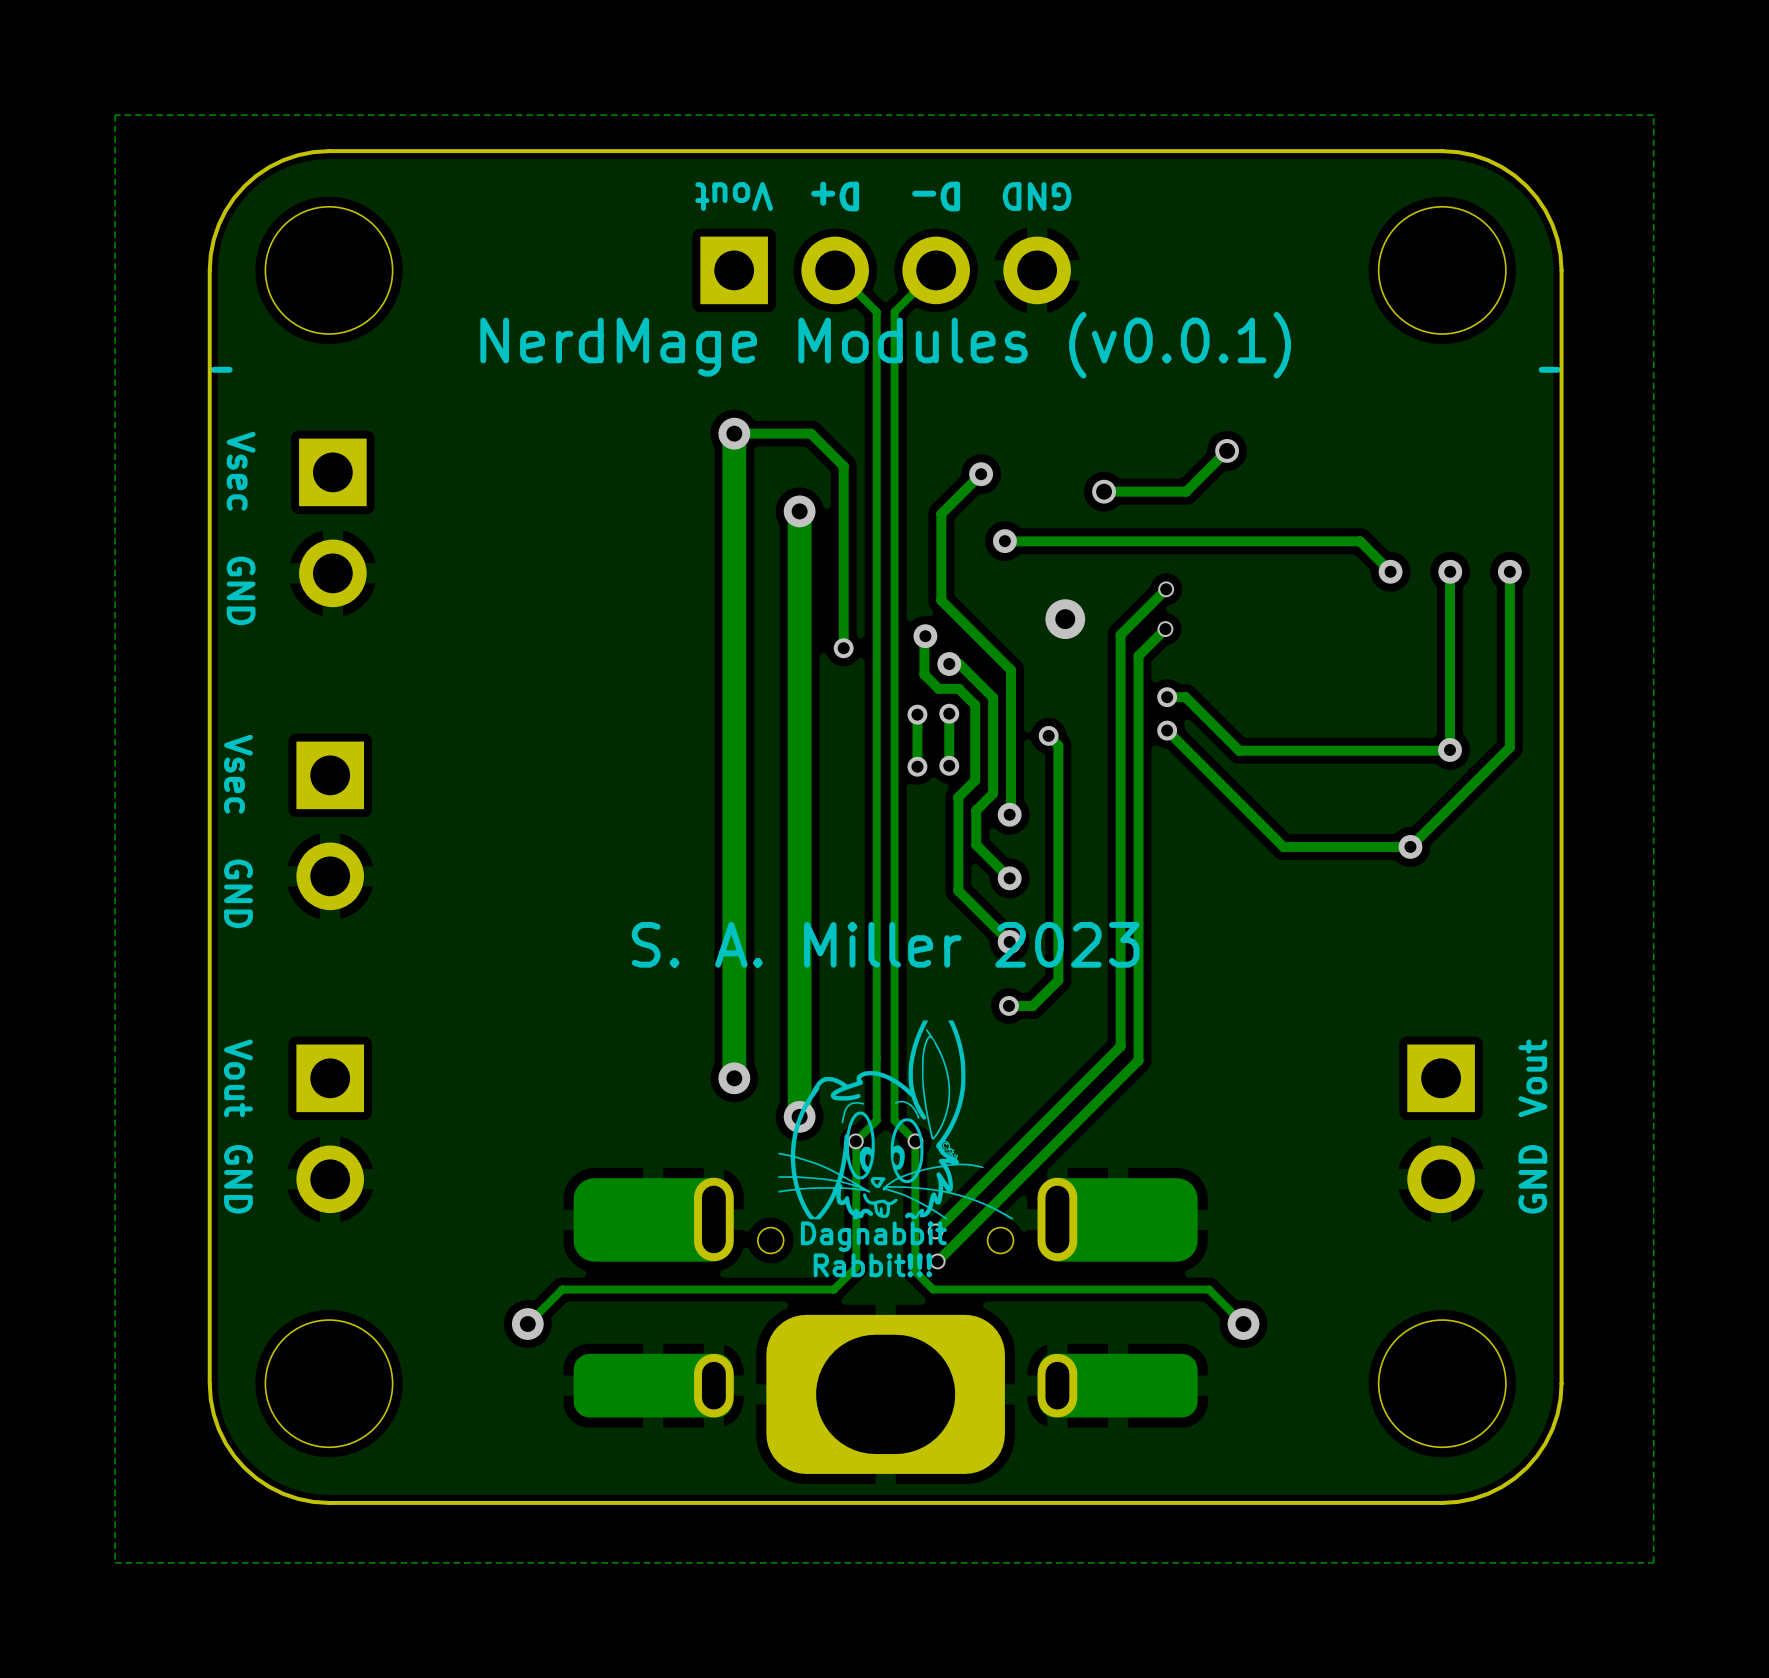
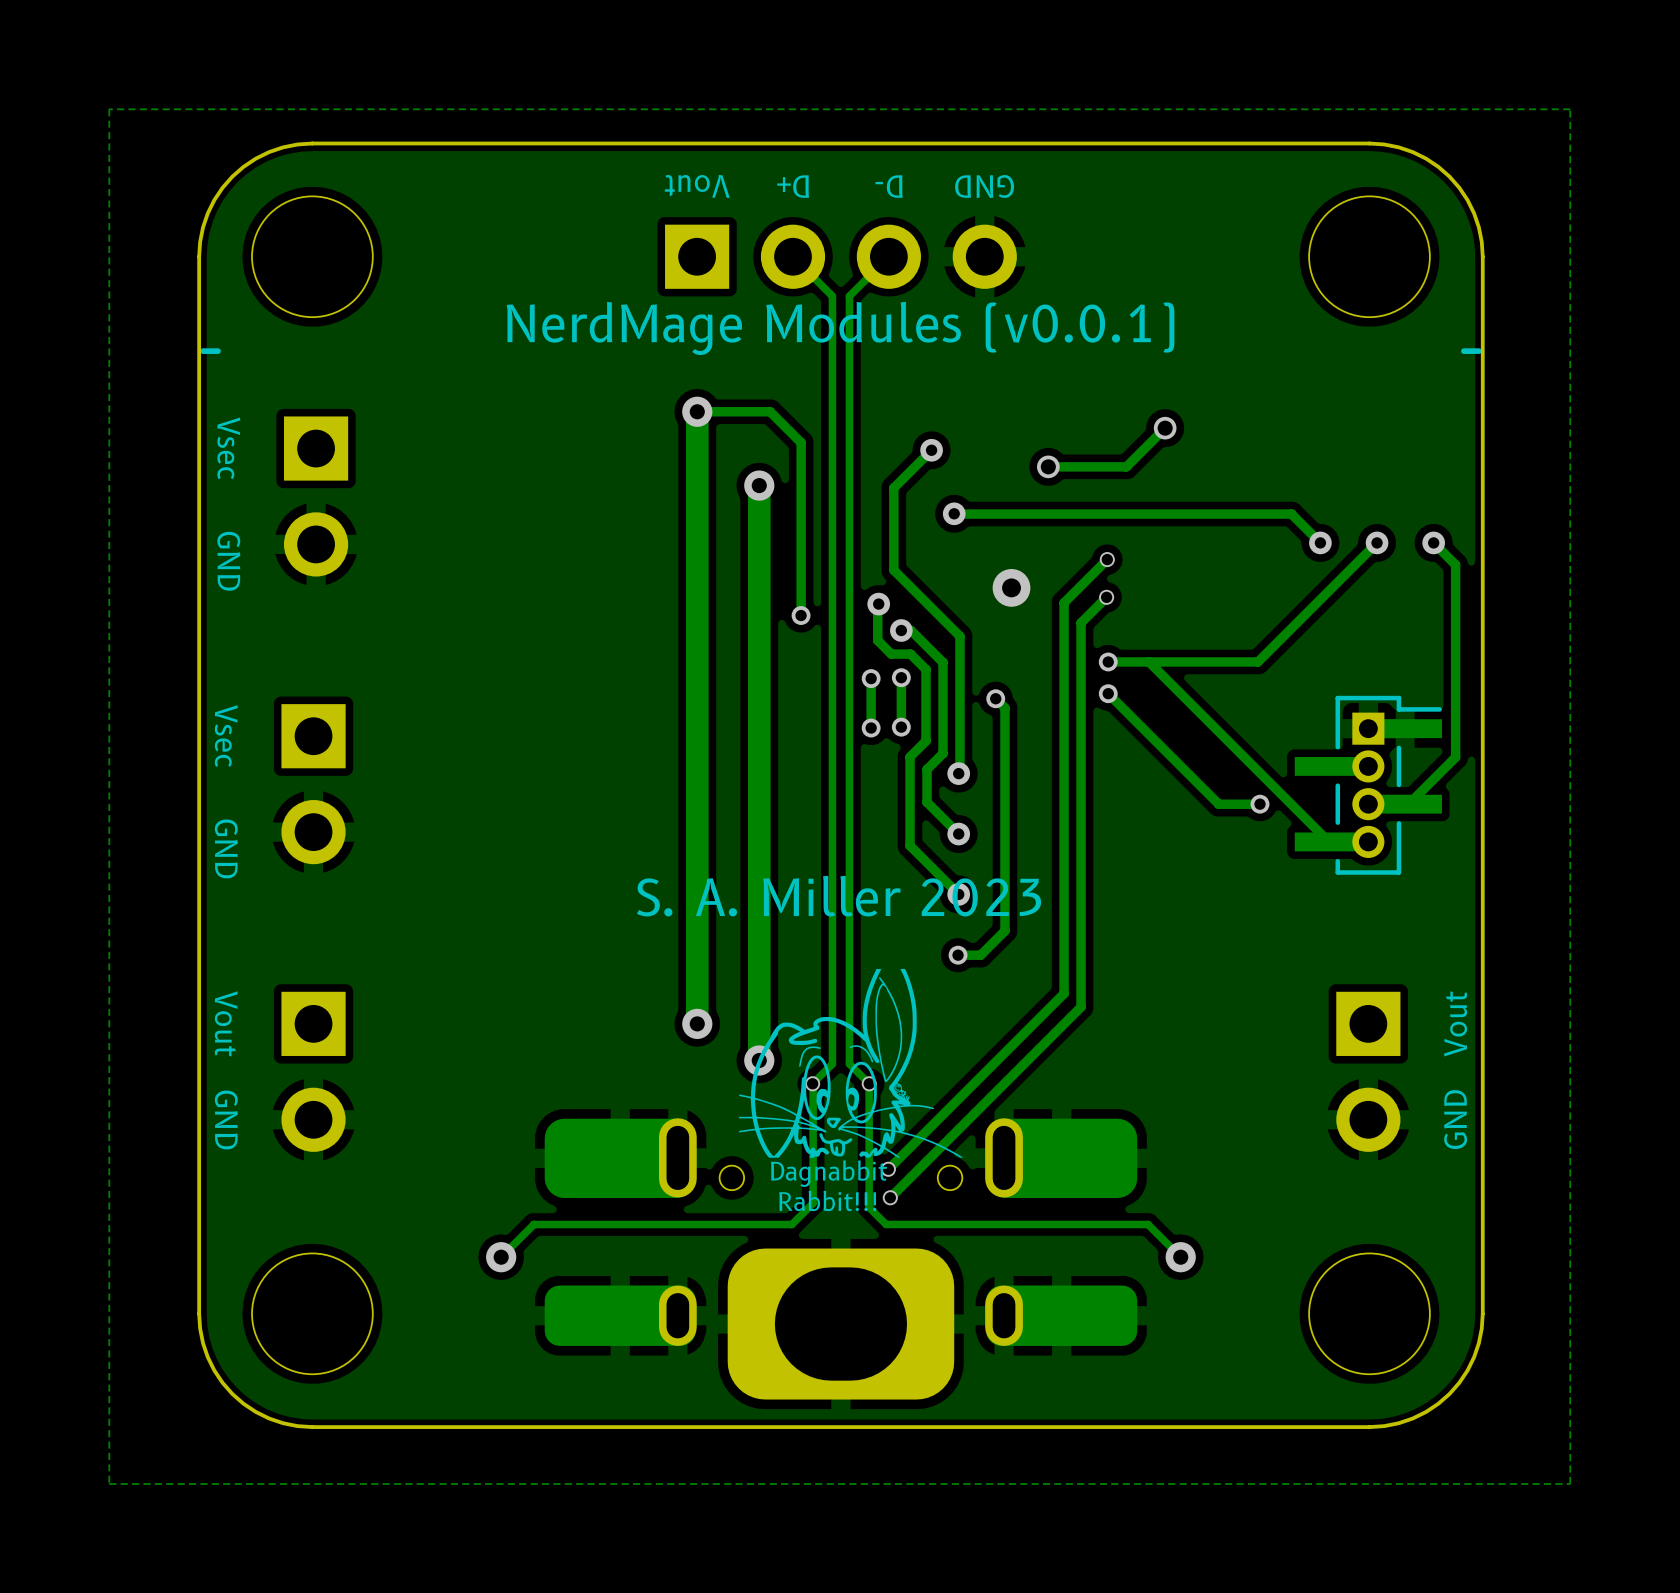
track: (1450, 571) (1449, 750) (1239, 750) (1185, 697) -> (1376, 543) (1257, 661) (1125, 661)
track: (1509, 571) (1509, 747) (1410, 846) (1326, 846) -> (1433, 542) (1455, 564) (1455, 757) (1408, 804) (1405, 804)
track: none -> (1149, 661) (1328, 841) (1368, 841)
via: (1450, 749) -> none
part: none -> (1368, 785)
via: none -> (1260, 804)
via: (1410, 846) -> none

